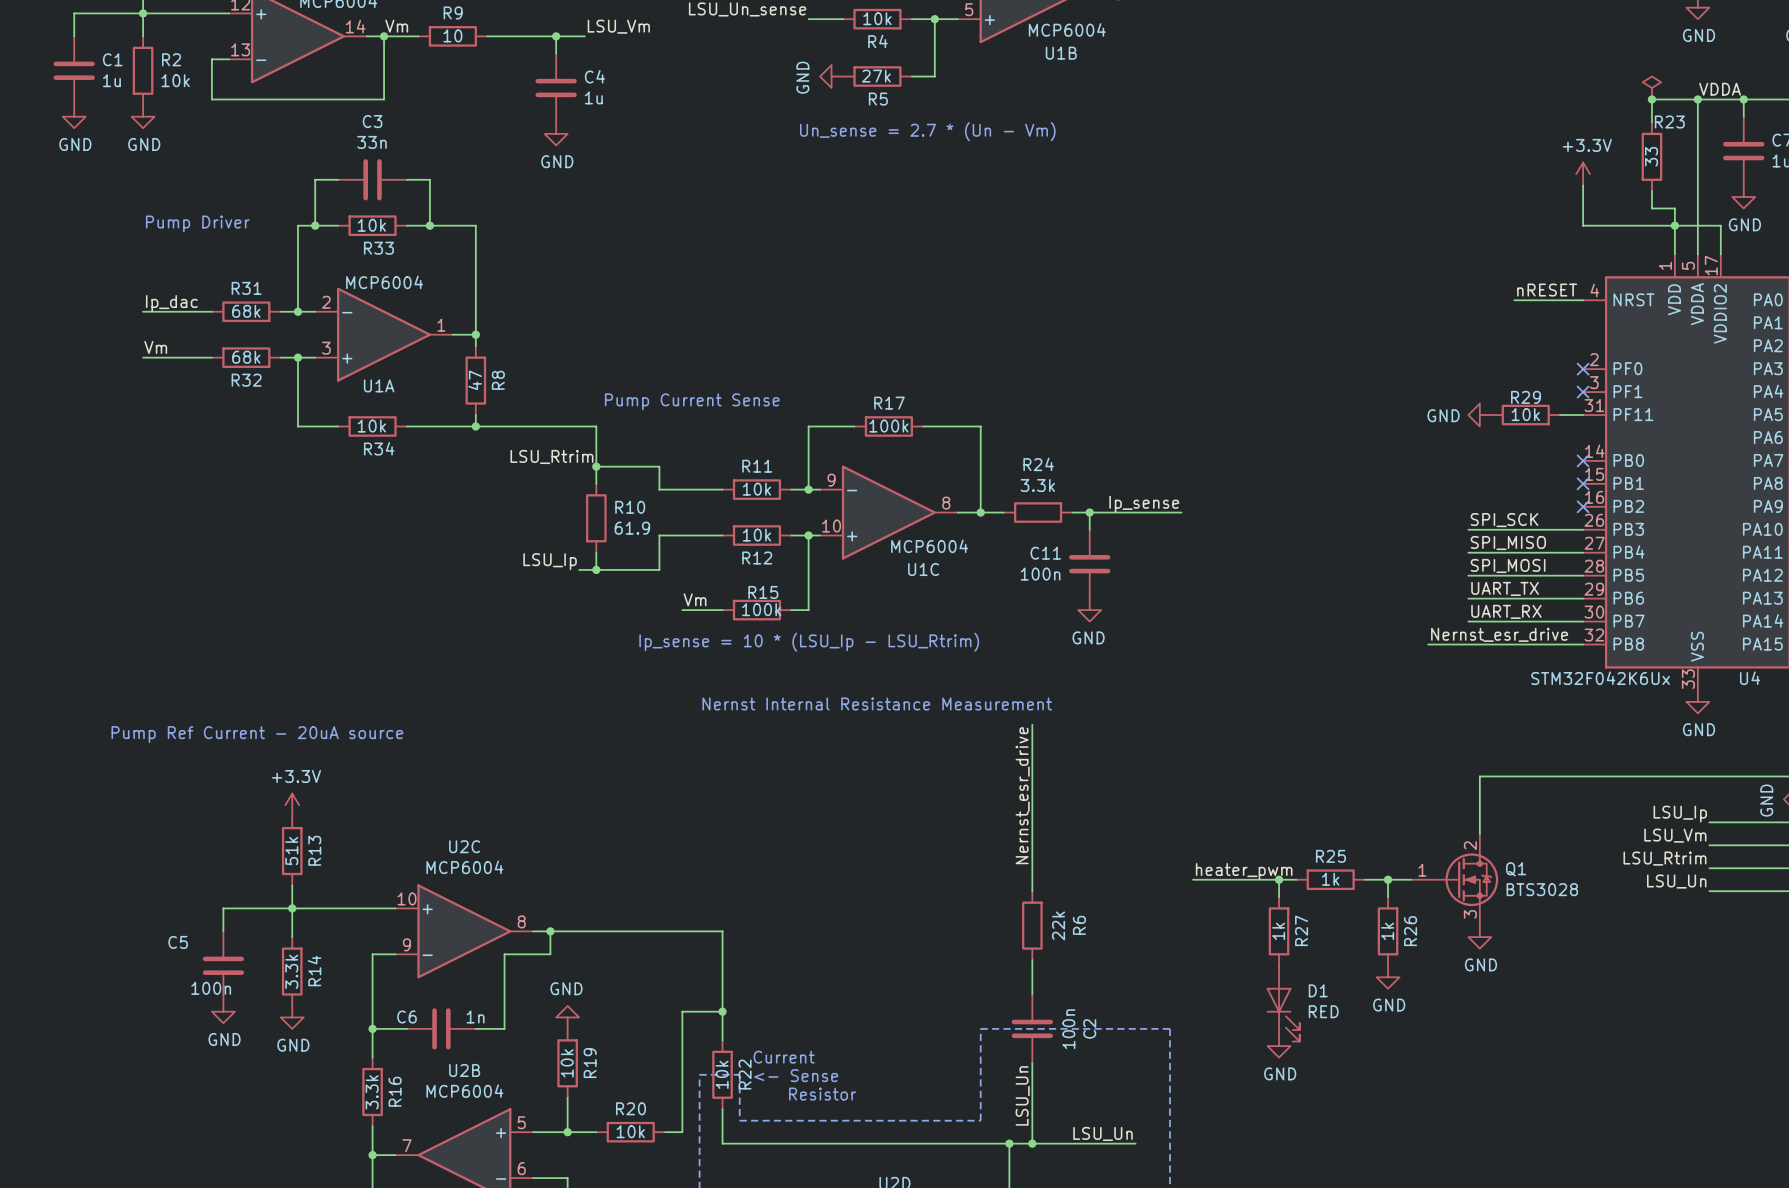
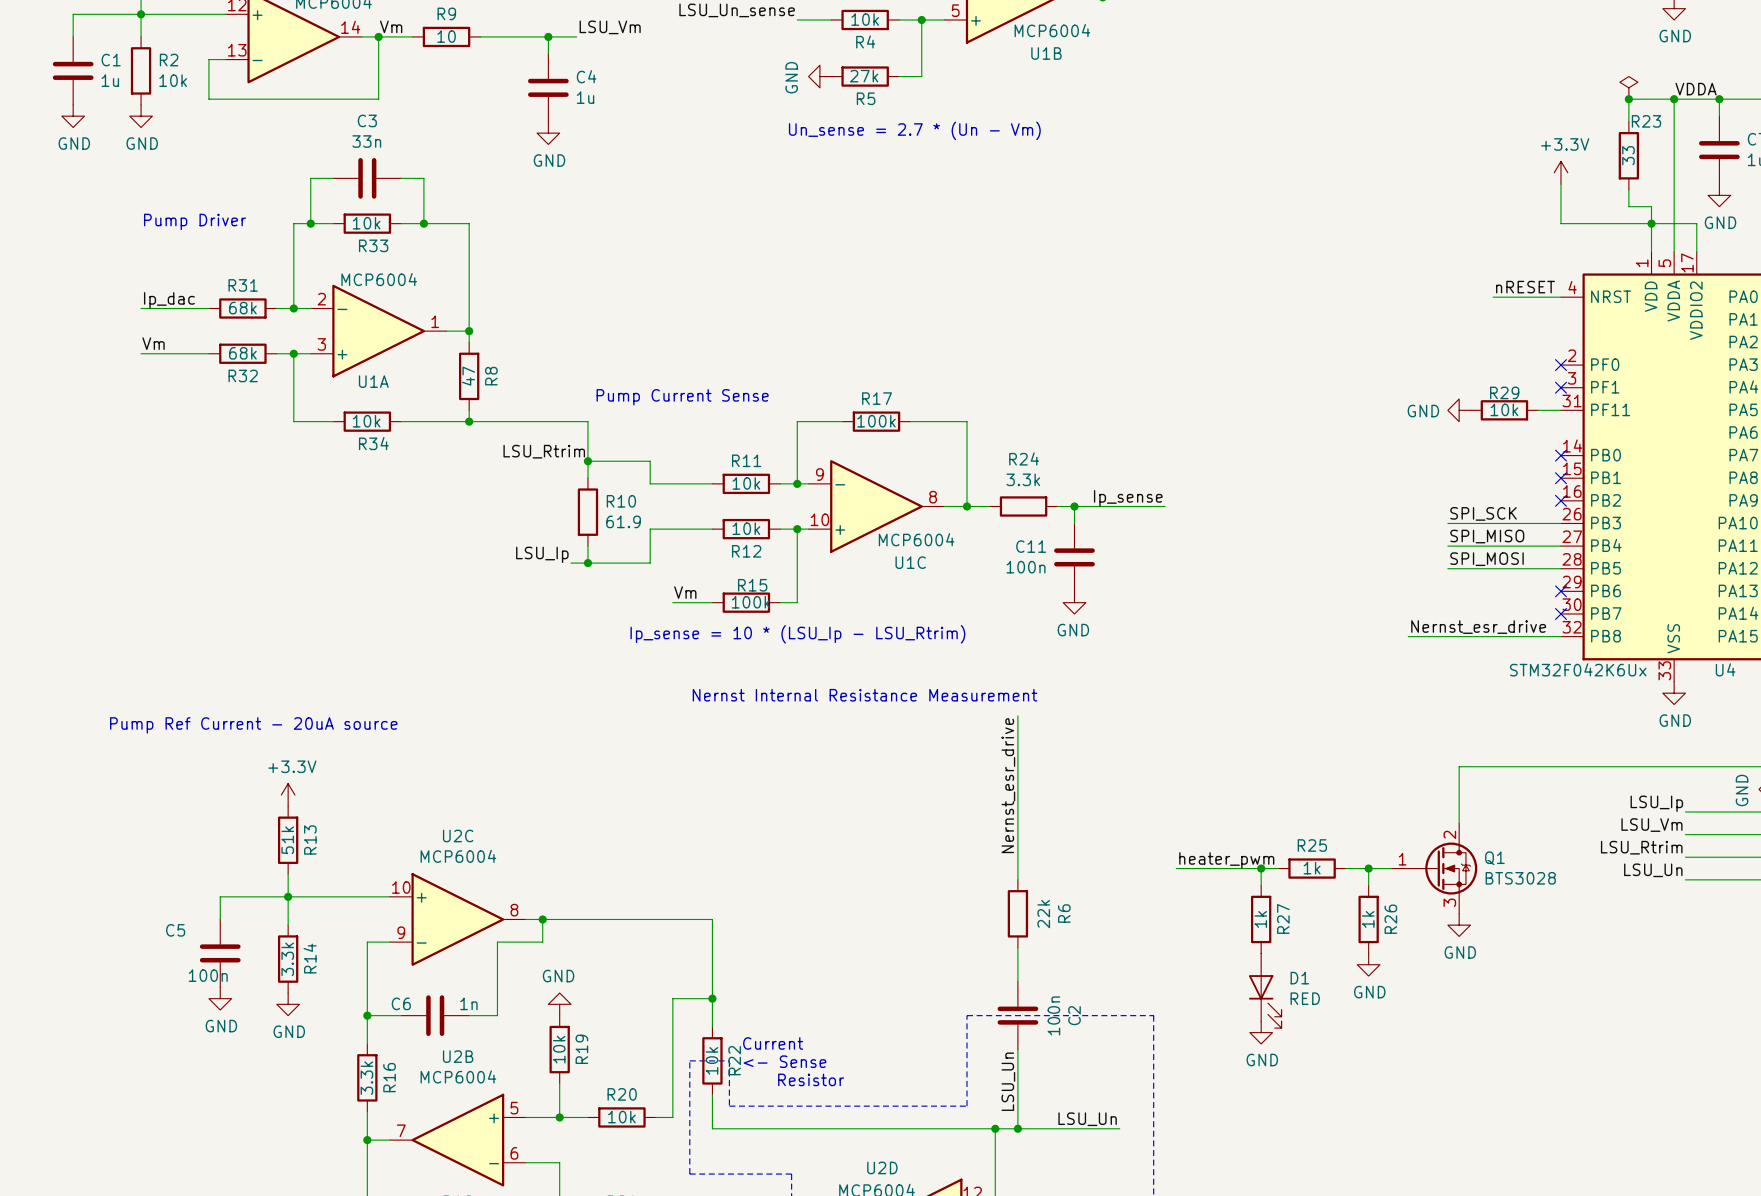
label: UART_TX (1505, 588) -> none
wire: (1468, 598) (1583, 598) -> none
no-connect mark: none -> (1560, 591)
label: UART_RX (1506, 611) -> none
wire: (1468, 621) (1583, 621) -> none
no-connect mark: none -> (1560, 613)

